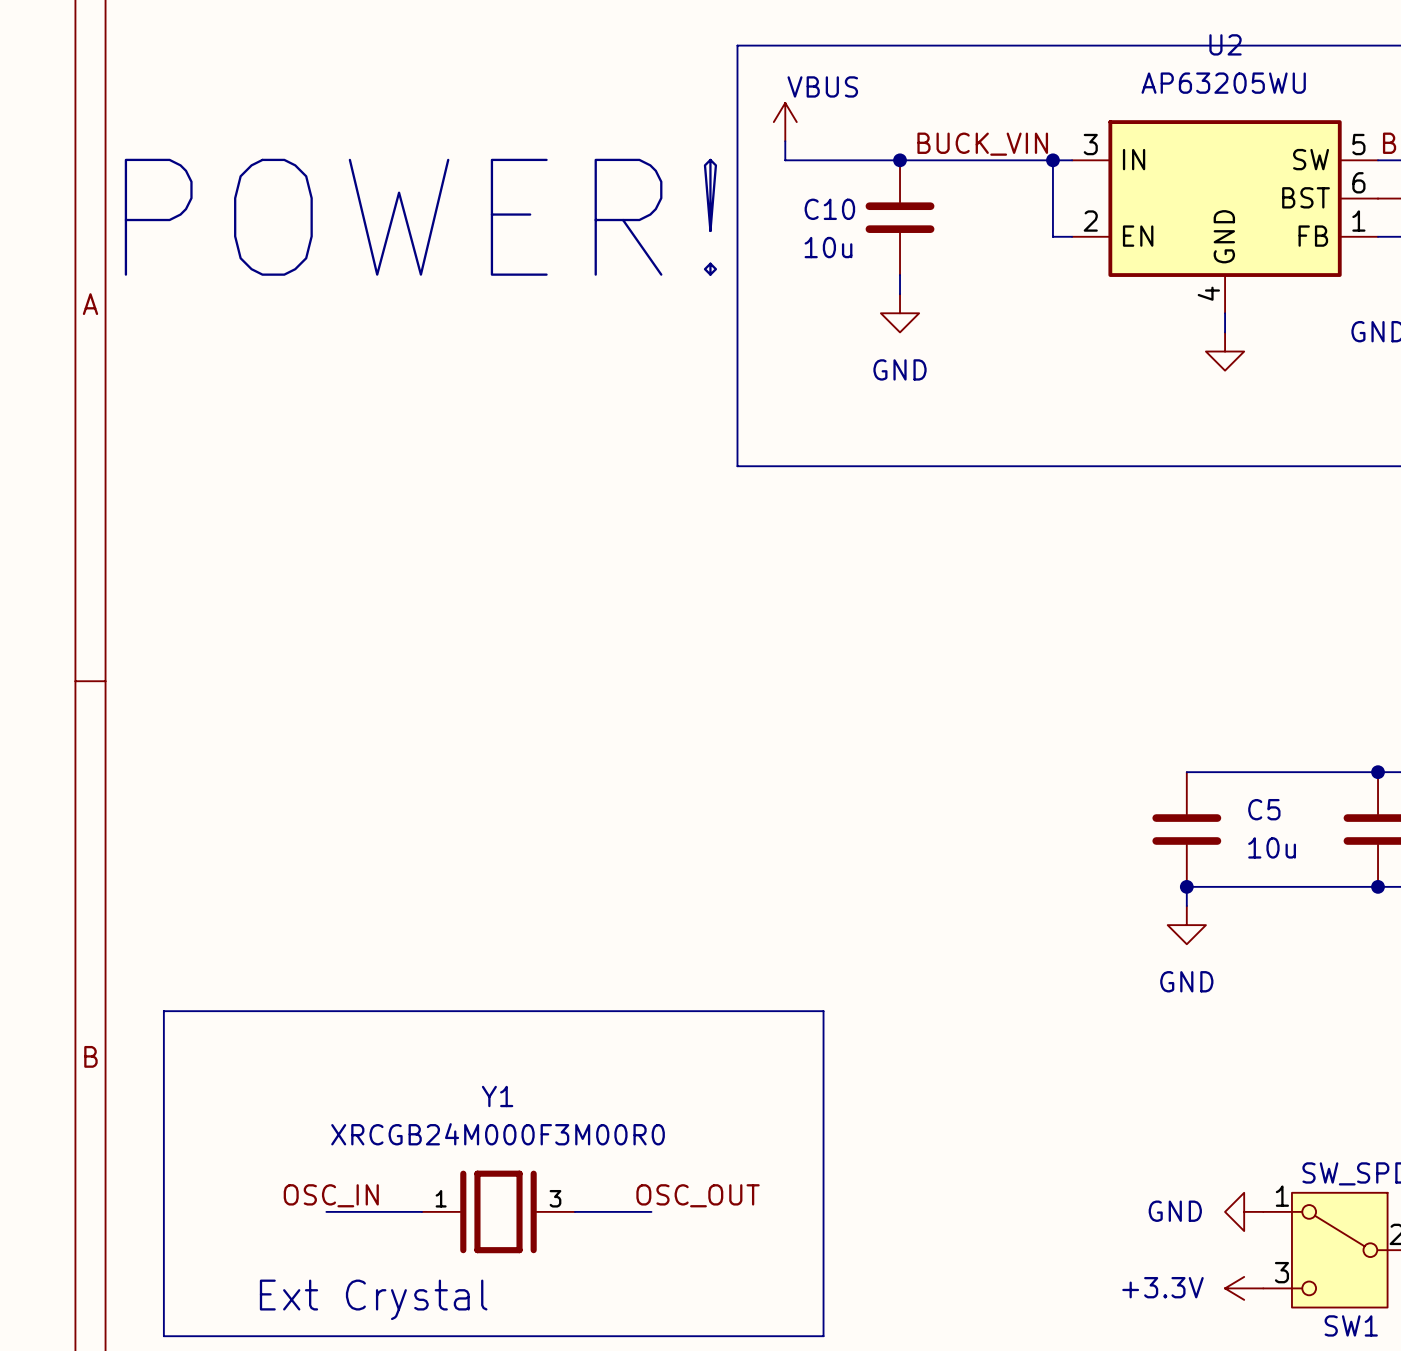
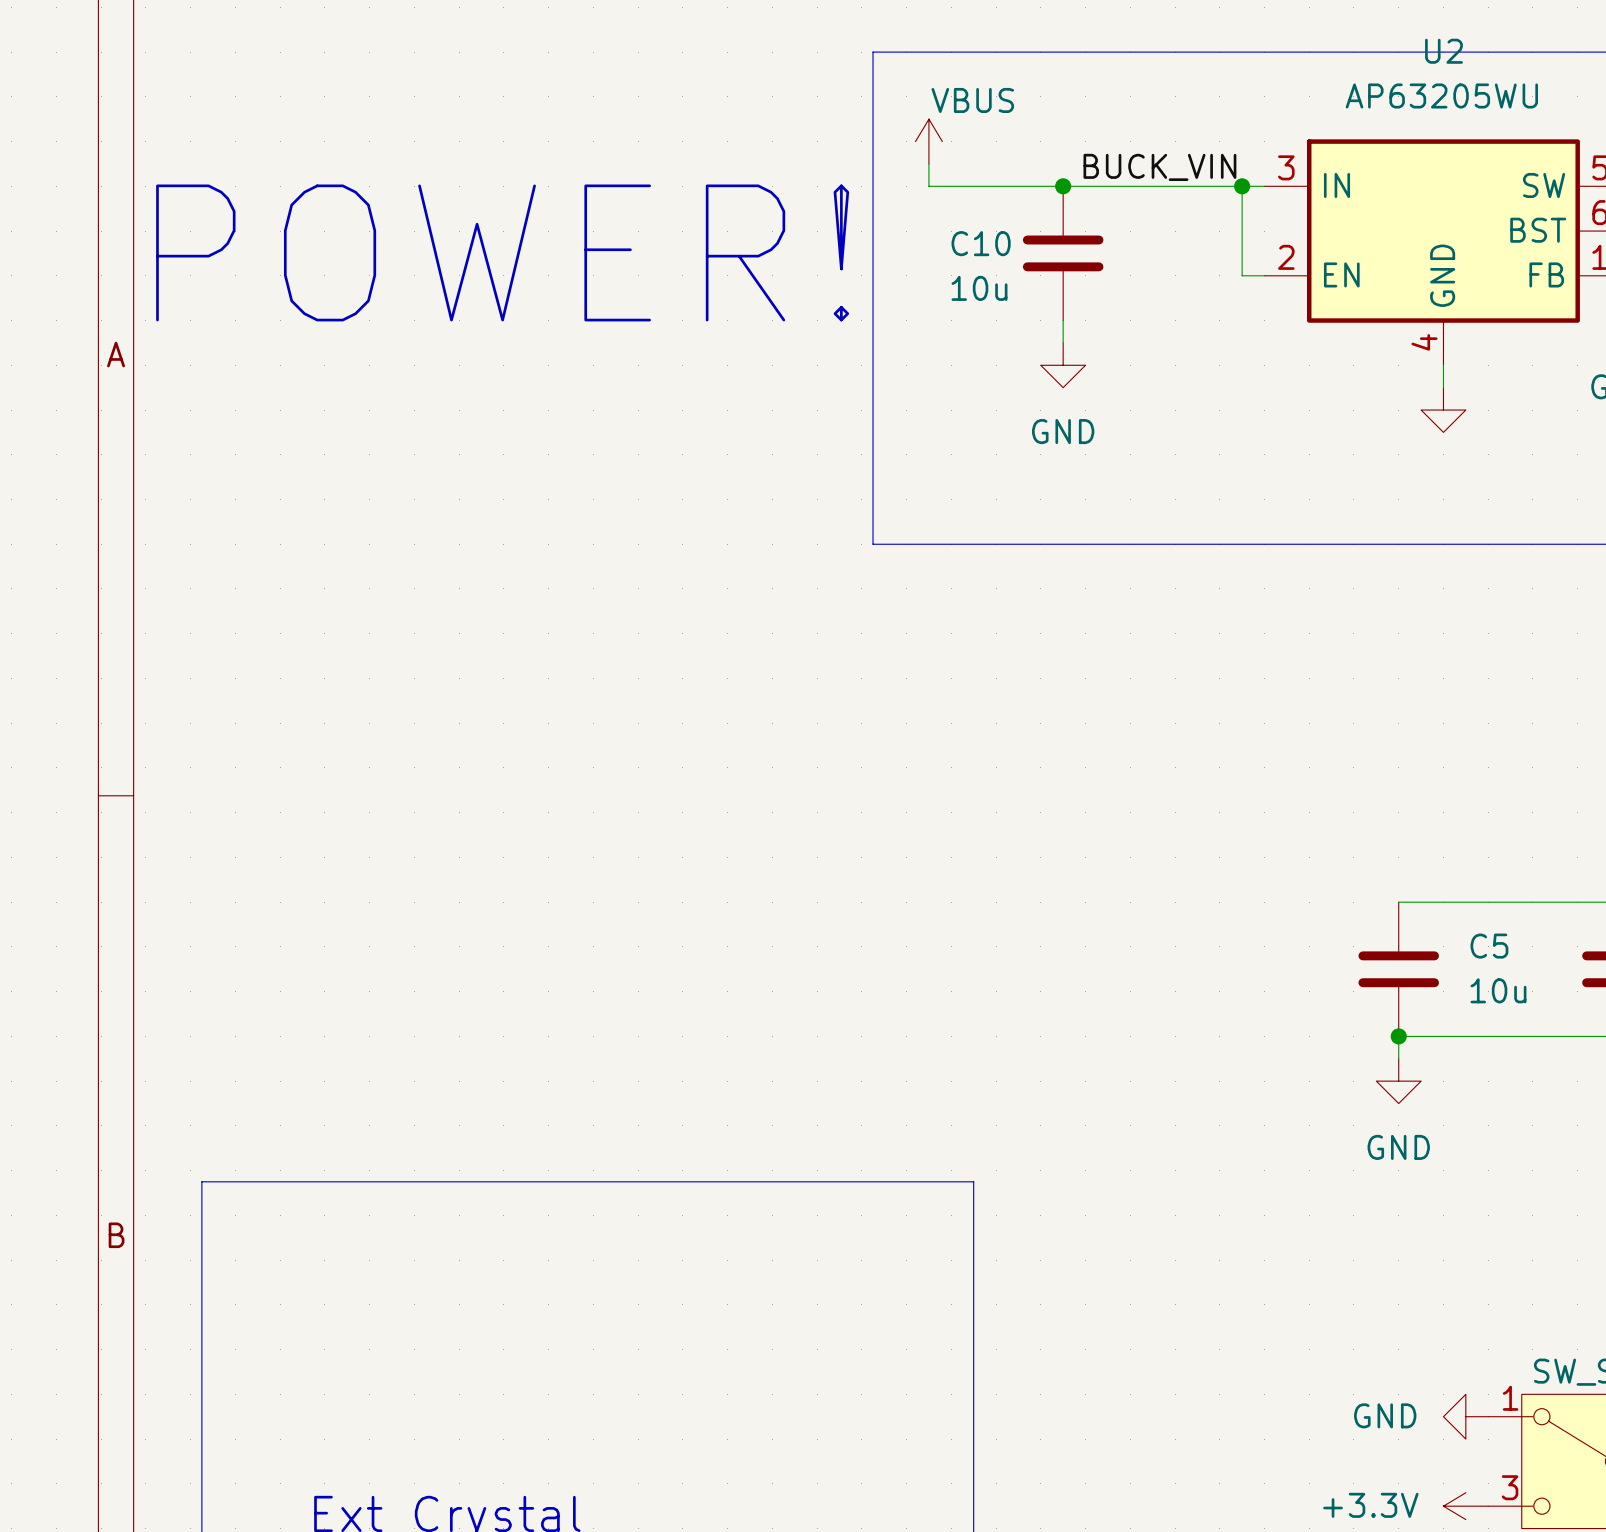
label: OSC_IN (331, 1195) -> none
label: OSC_OUT (698, 1195) -> none
wire: (326, 1211) (422, 1211) -> none
Y1: XRCGB24M000F3M00R0 (498, 1211) -> none
wire: (574, 1211) (651, 1211) -> none

